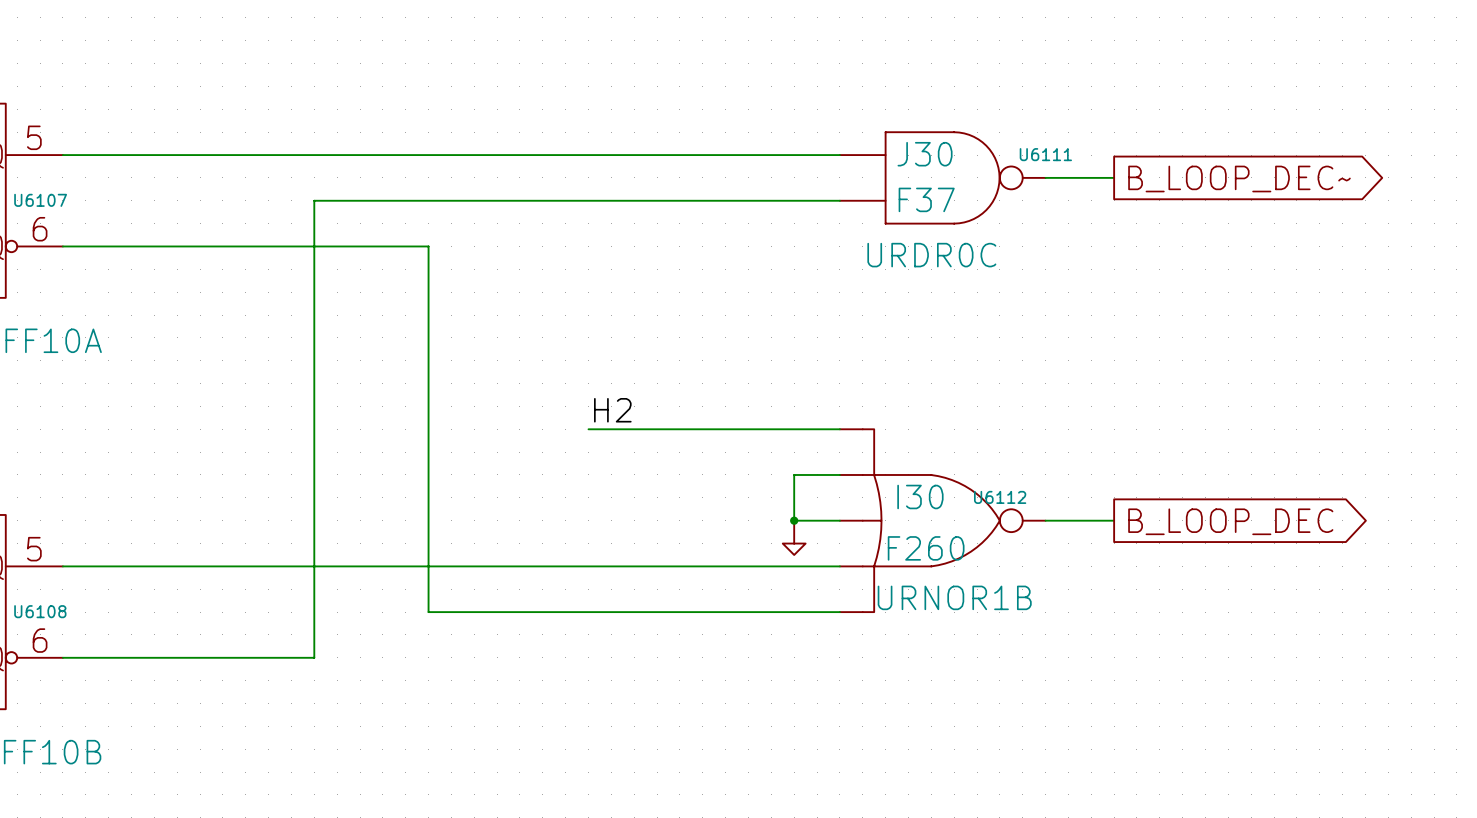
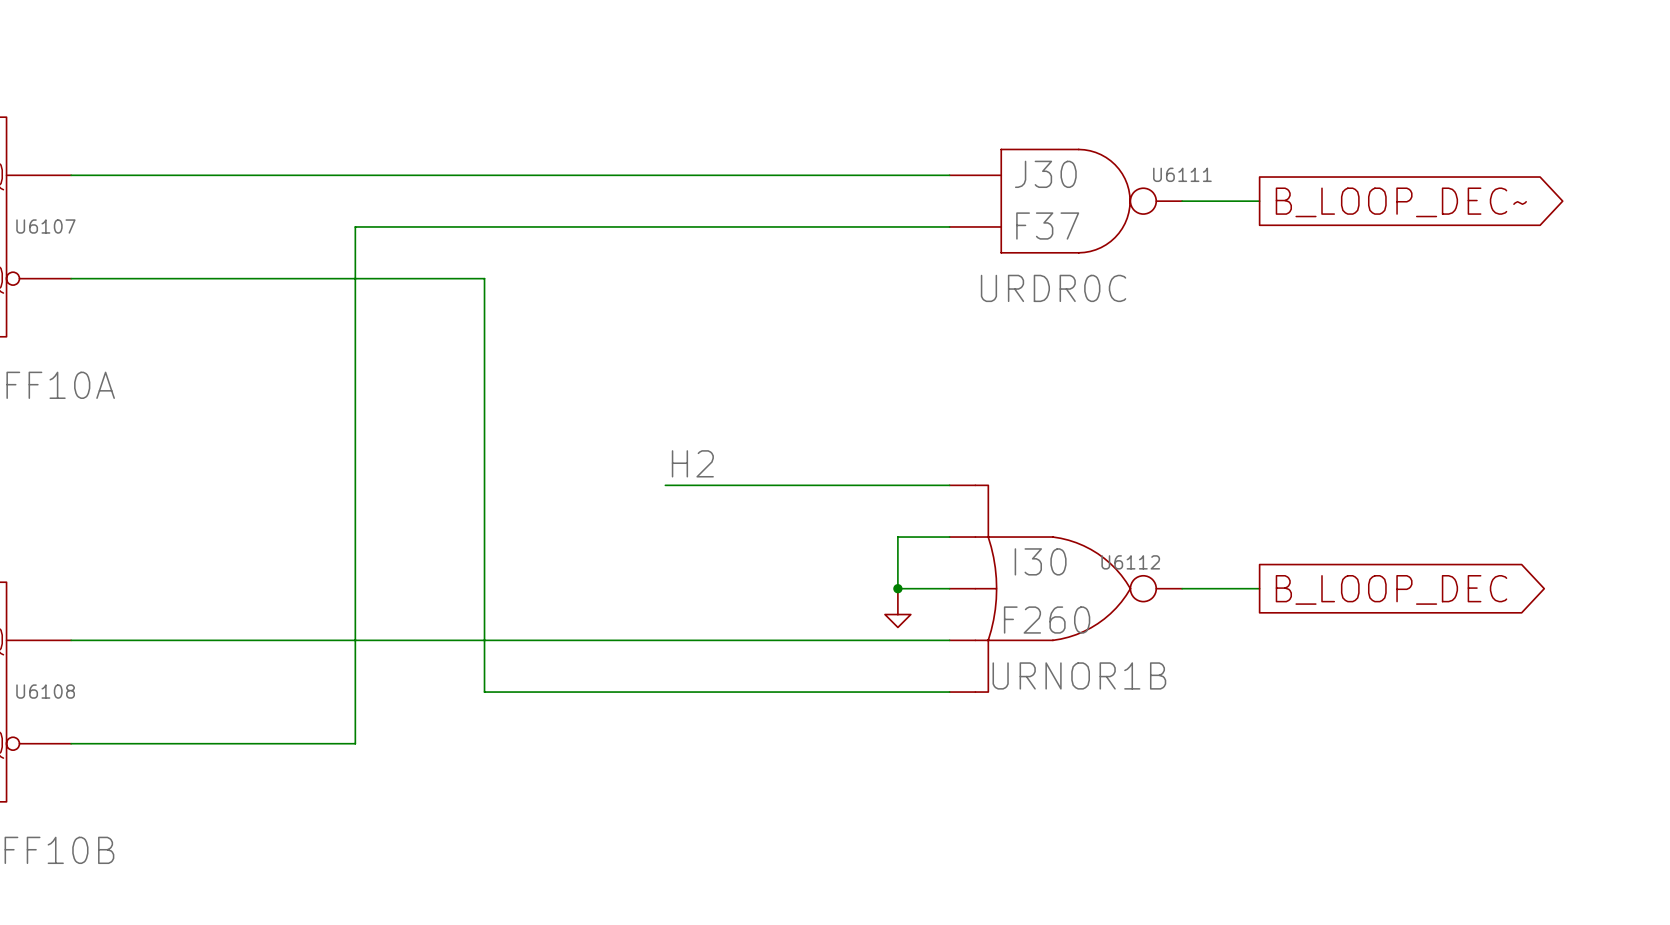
U6107 pin number: 5 (34, 137) -> none
U6107 pin number: 6 (40, 229) -> none
U6108 pin number: 5 (34, 549) -> none
U6108 pin number: 6 (40, 640) -> none

